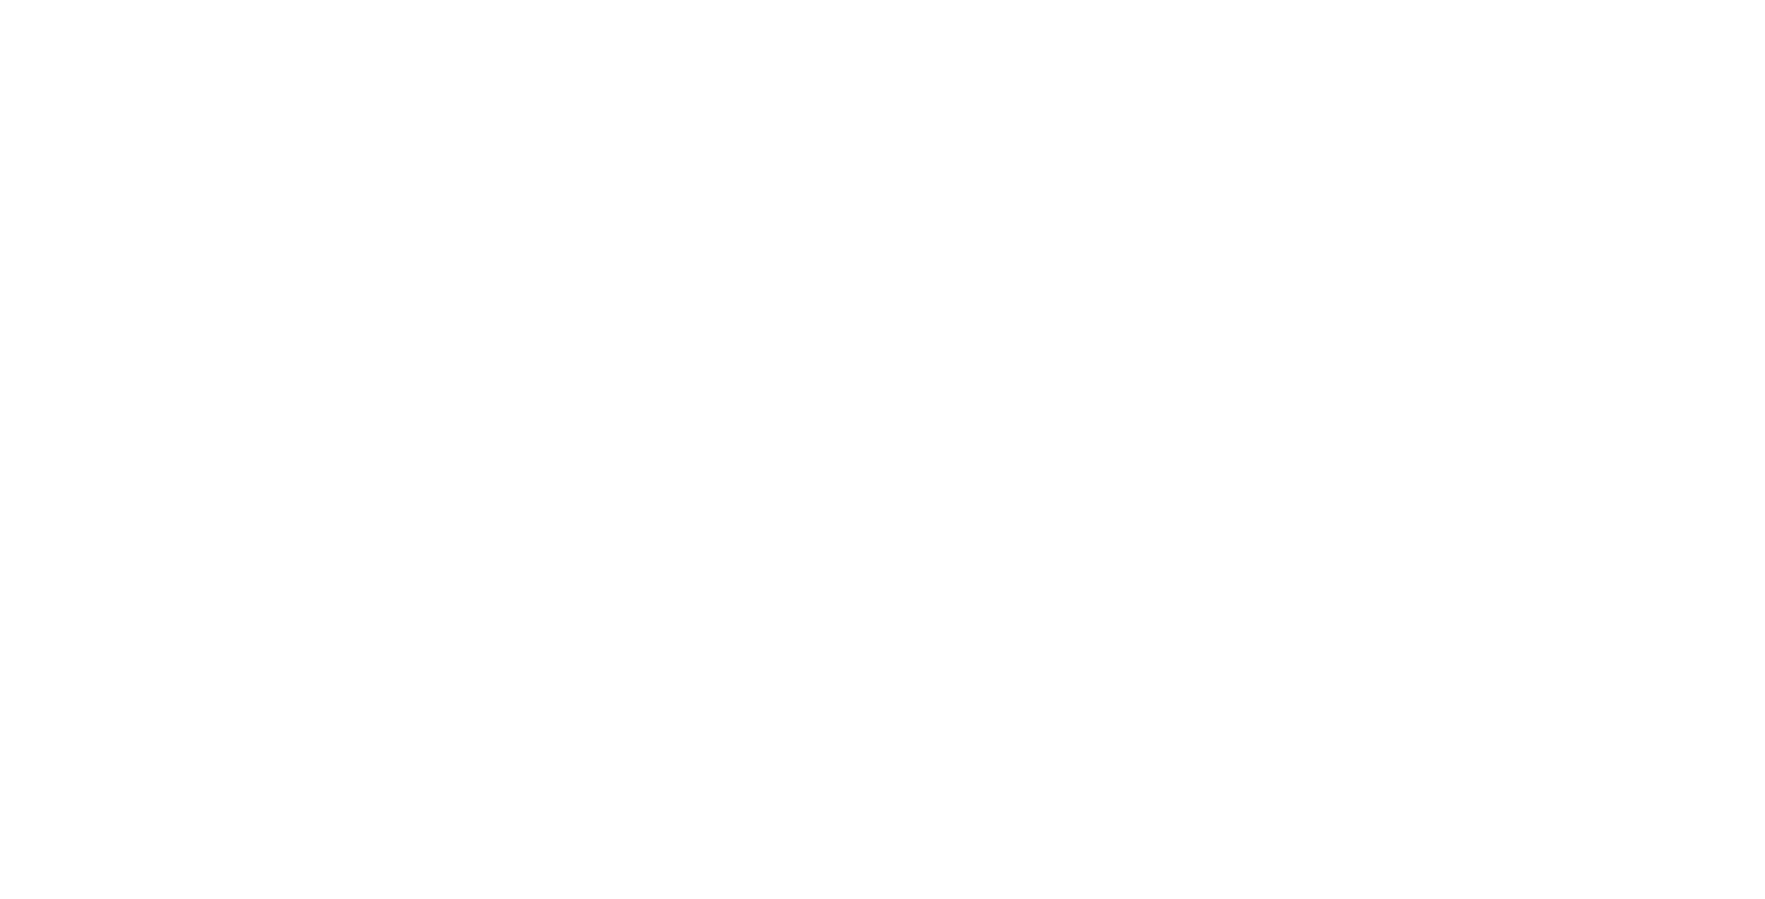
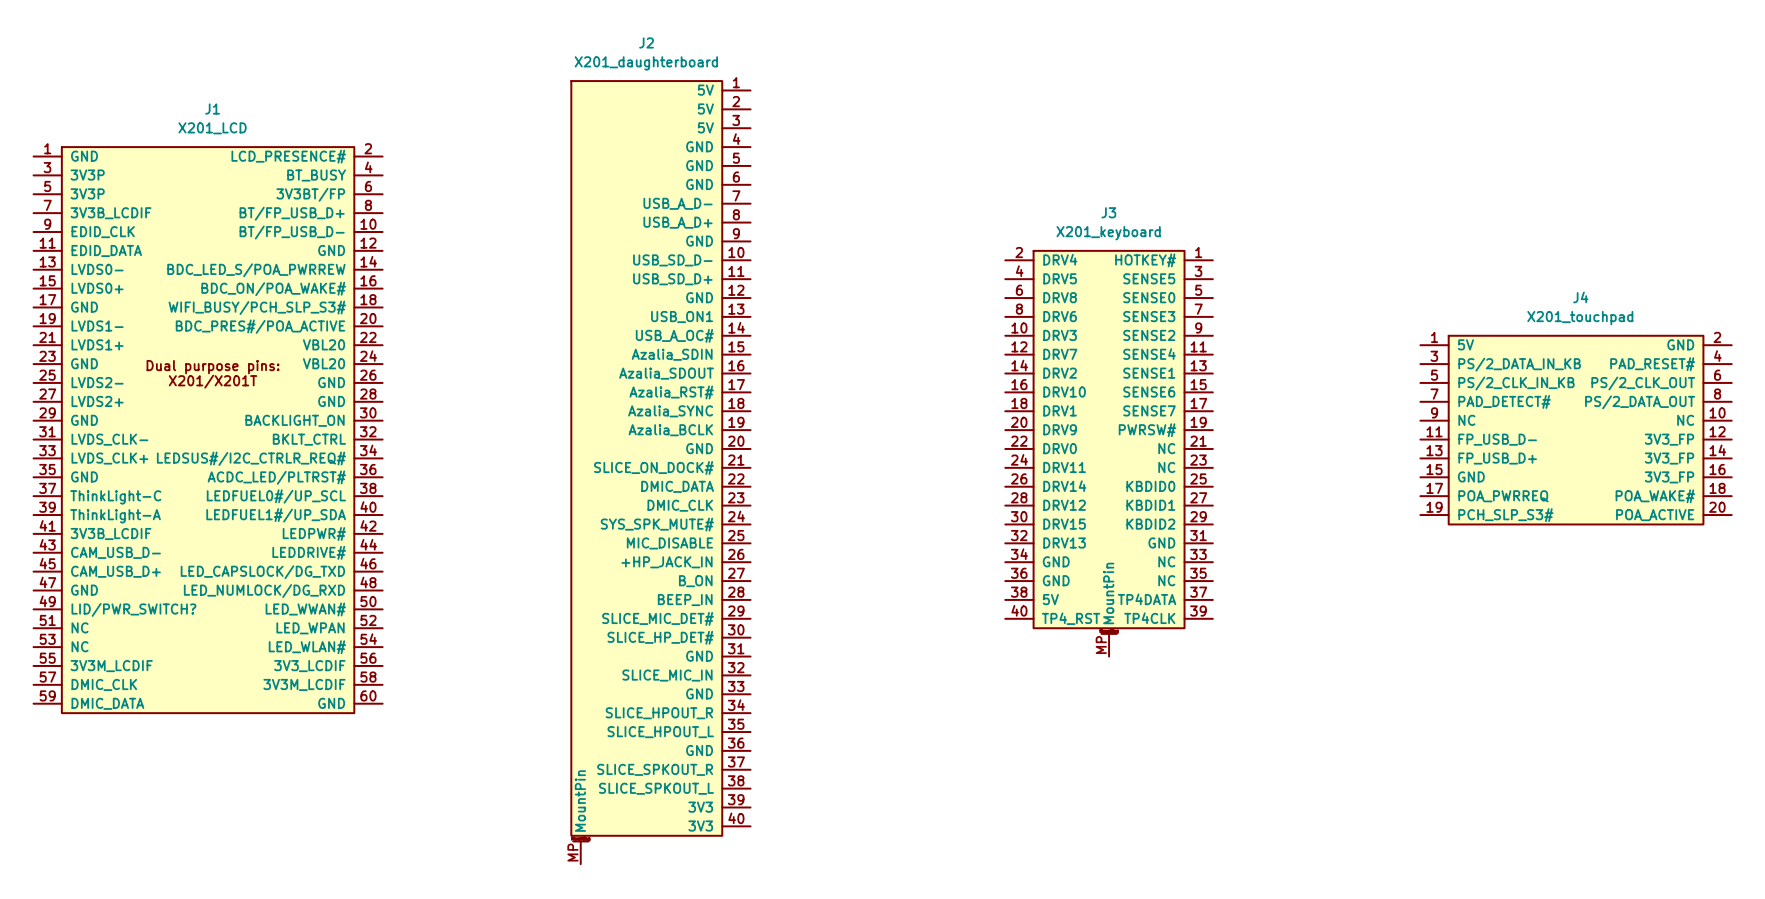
J1: none -> X201_LCD (208, 430)
J4: none -> X201_touchpad (1576, 430)
J3: none -> X201_keyboard (1109, 453)
J2: none -> X201_daughterboard (660, 472)

